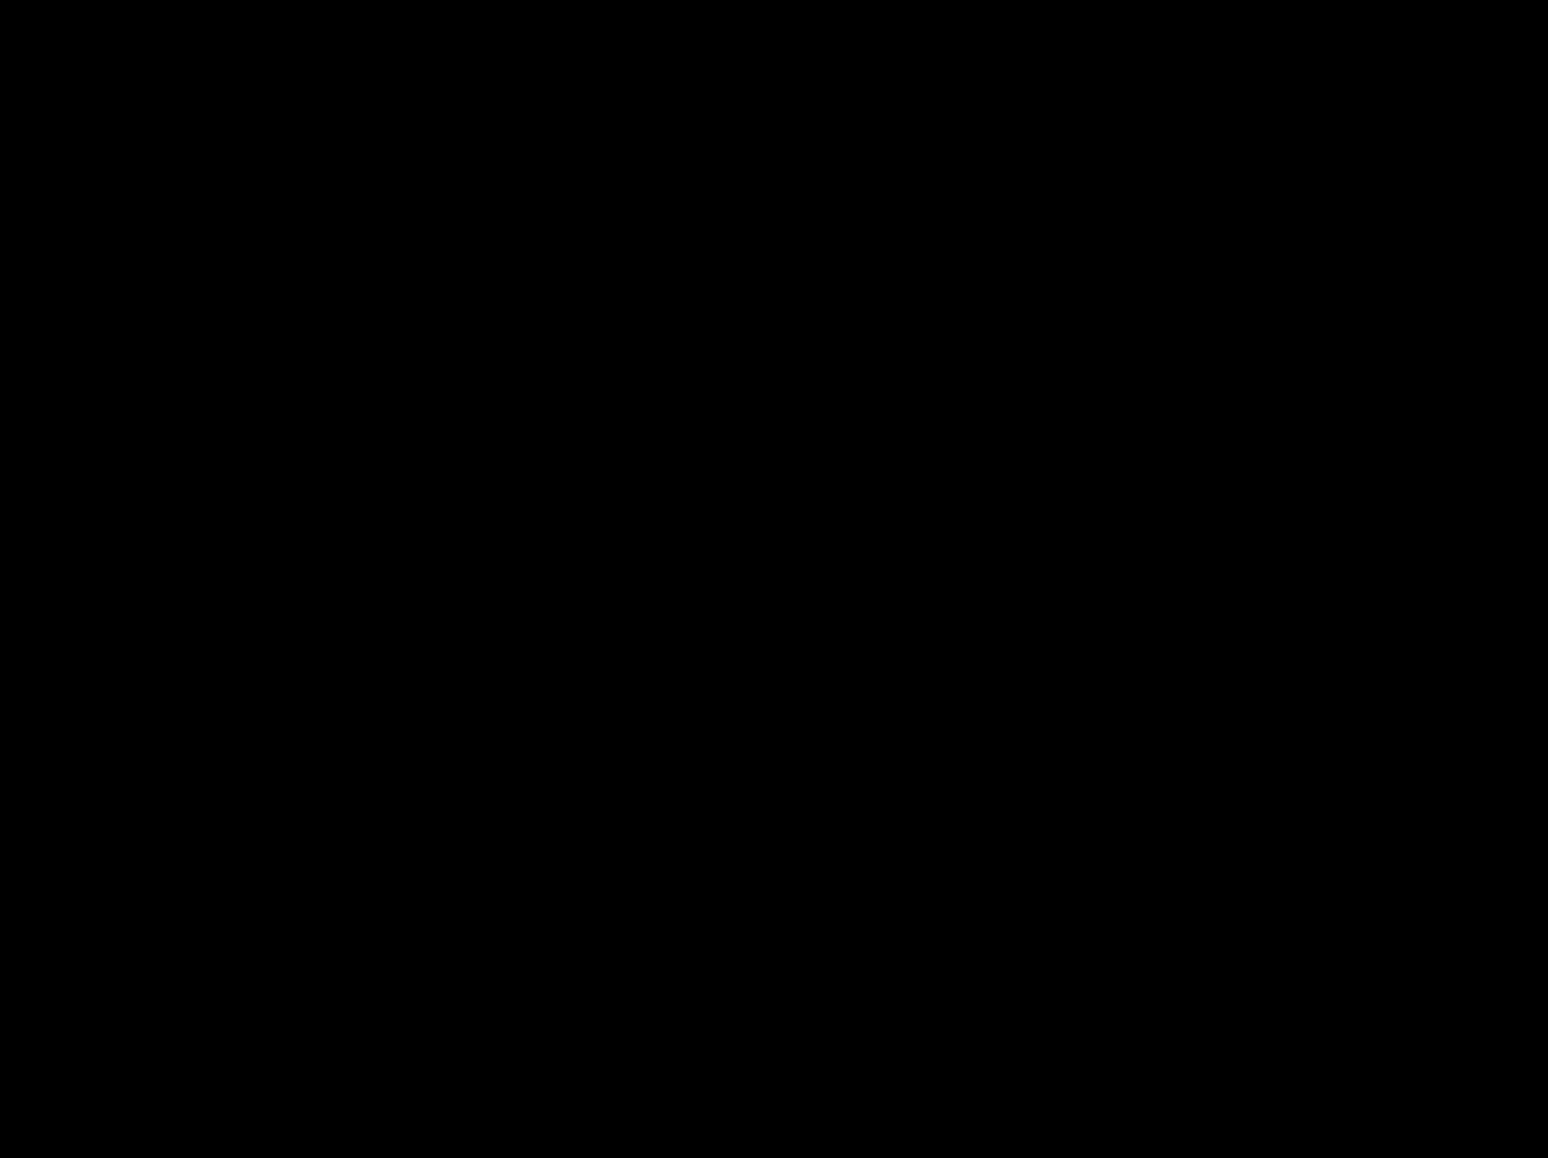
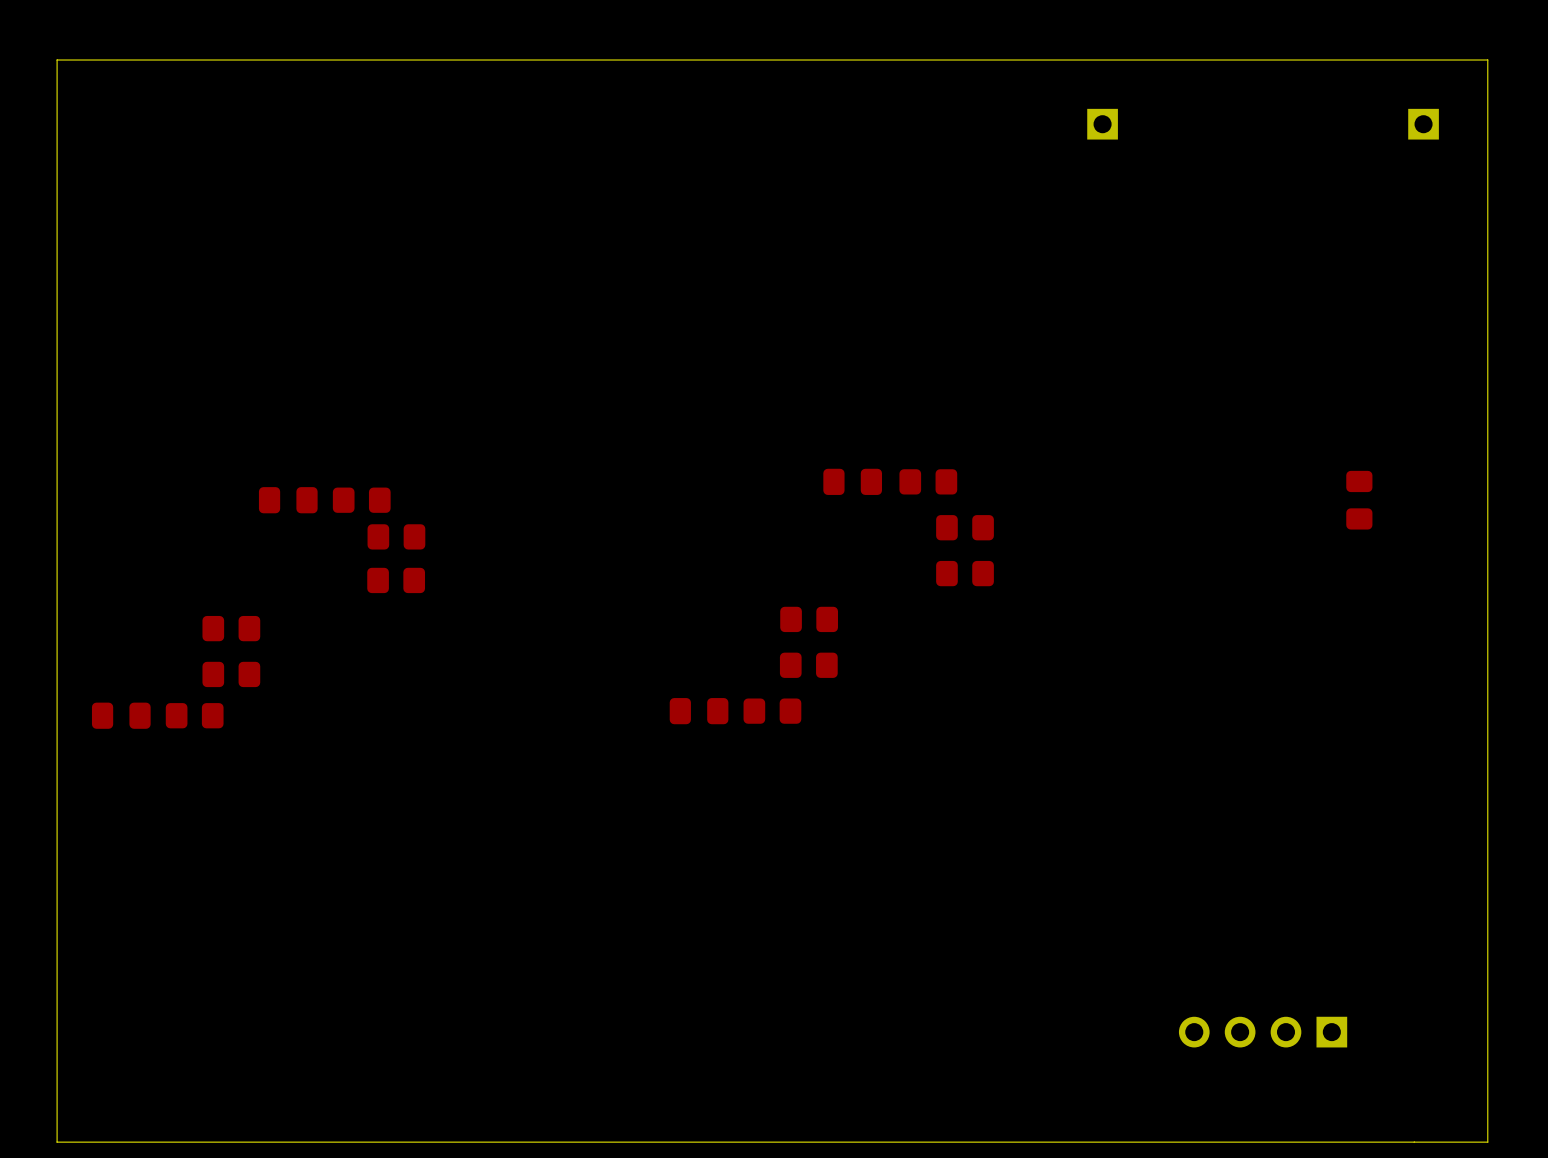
board edge: none -> (1487, 60) (1487, 1142) (57, 1142) (57, 60) (1487, 60)
part: none -> (1102, 124)
part: none -> (1423, 124)
part: none -> (852, 481)
part: none -> (928, 481)
part: none -> (288, 500)
part: none -> (361, 500)
part: none -> (1359, 500)
part: none -> (965, 527)
part: none -> (396, 536)
part: none -> (965, 573)
part: none -> (396, 580)
part: none -> (809, 619)
part: none -> (231, 628)
part: none -> (808, 665)
part: none -> (231, 674)
part: none -> (699, 711)
part: none -> (772, 711)
part: none -> (121, 715)
part: none -> (194, 715)
part: none -> (1263, 1032)

